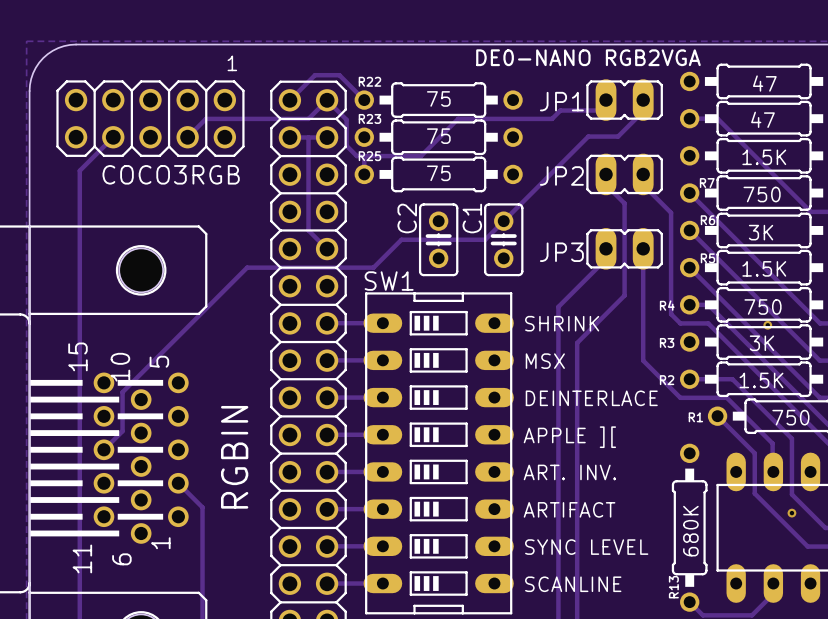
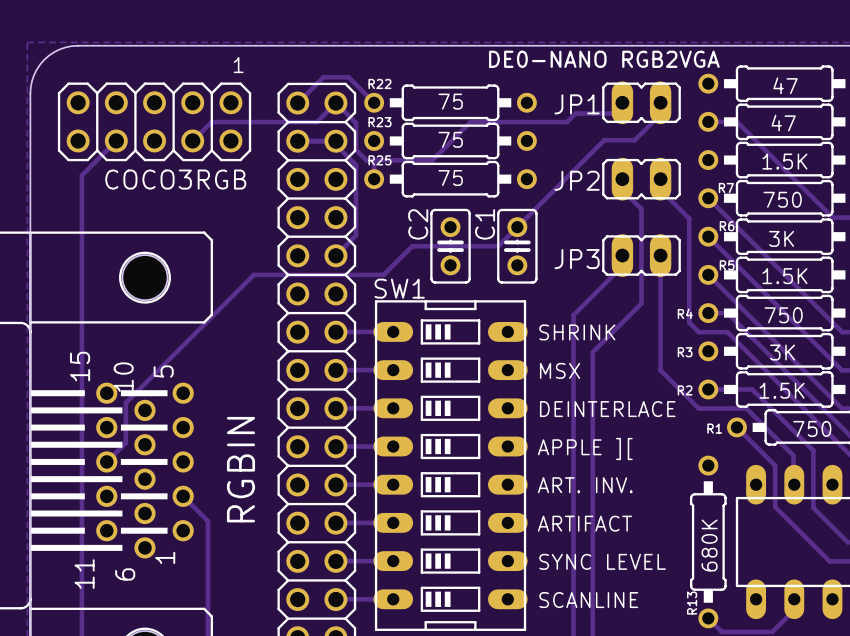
track: (308, 137) (308, 230) (327, 249) -> (297, 140) (335, 140) (335, 145) (355, 165) (355, 235) (335, 255)
via: (767, 325) -> none
via: (791, 513) -> none

